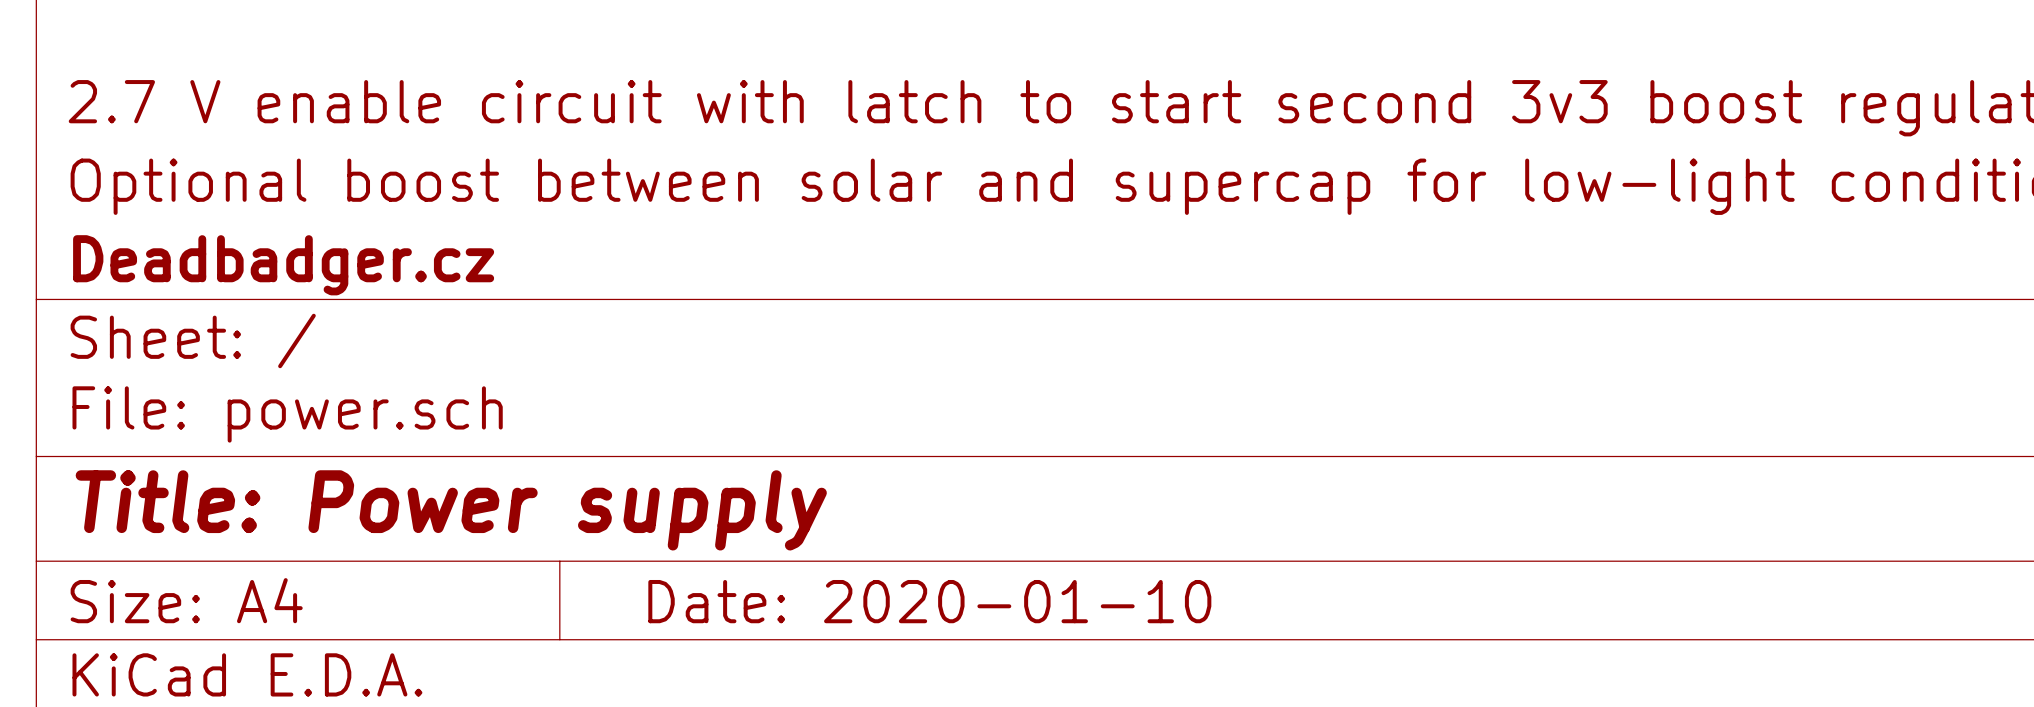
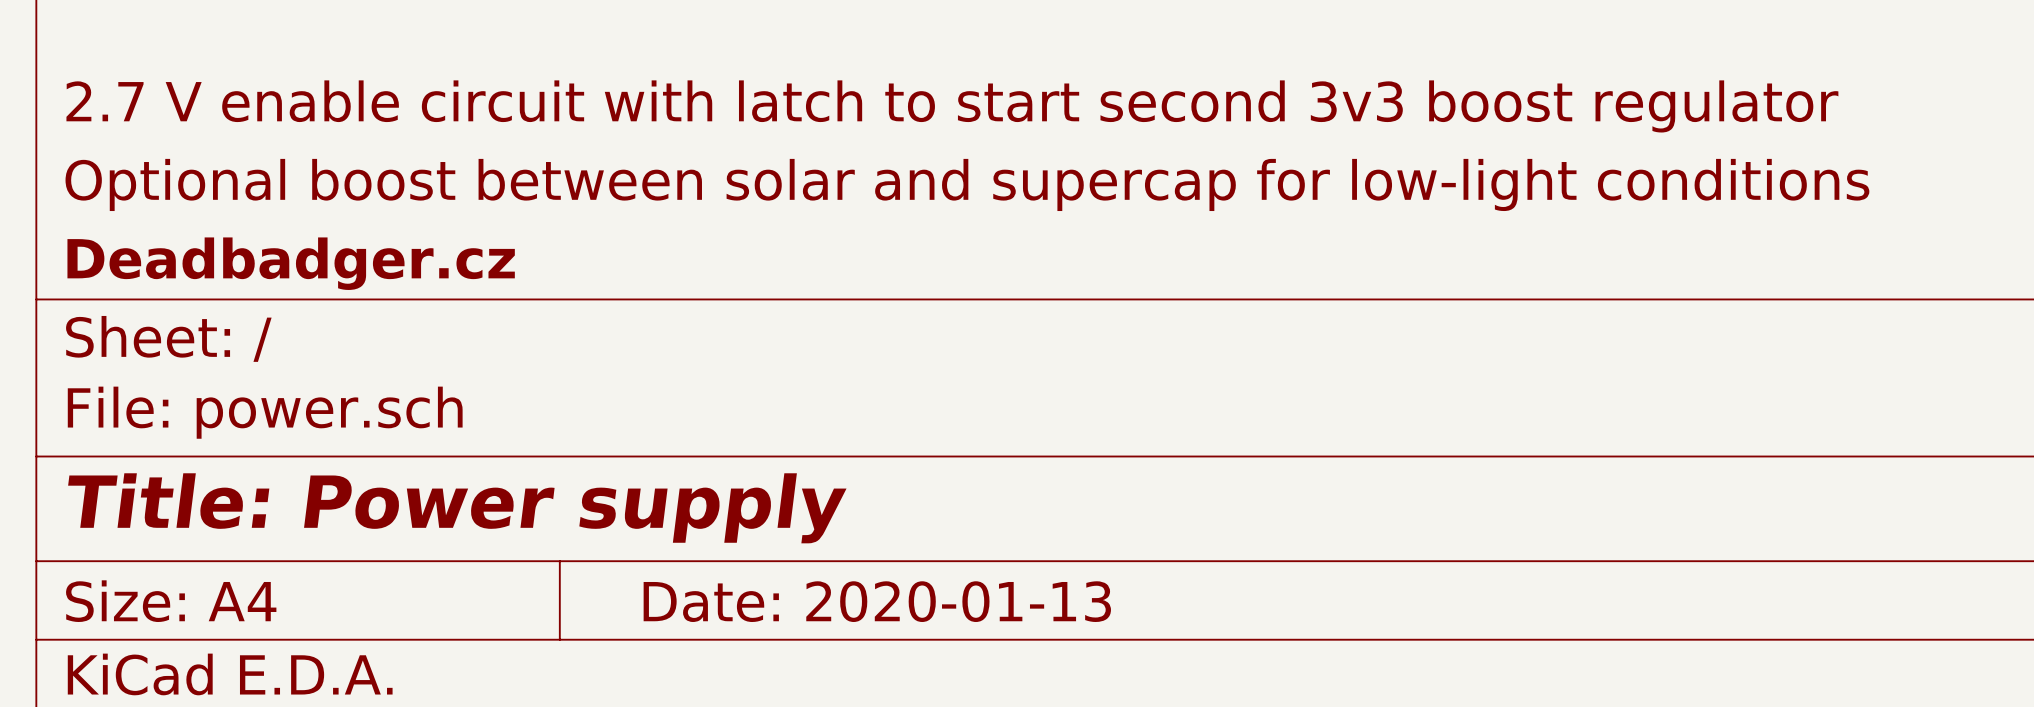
title block: Date: 2020-01-10 (929, 601) -> Date: 2020-01-13 (877, 601)

